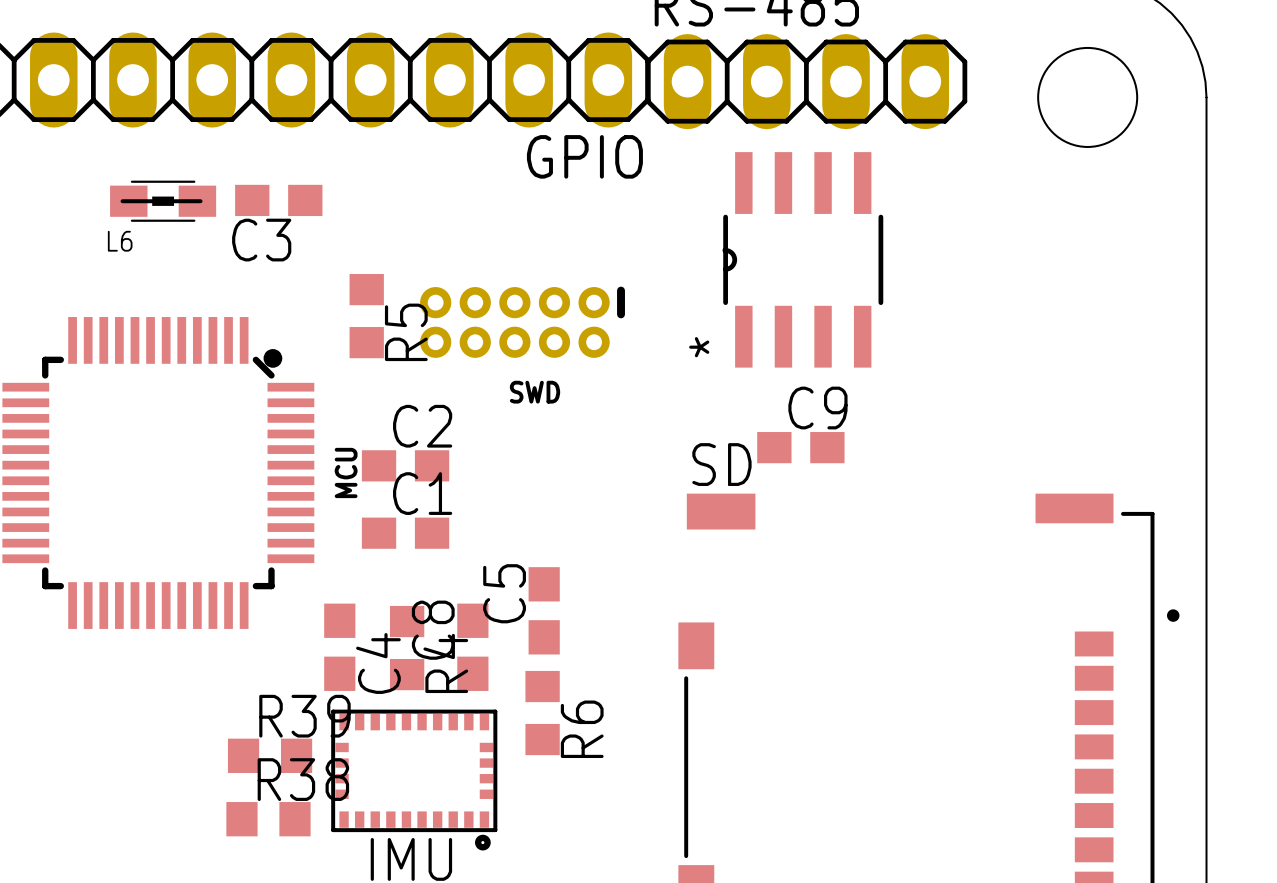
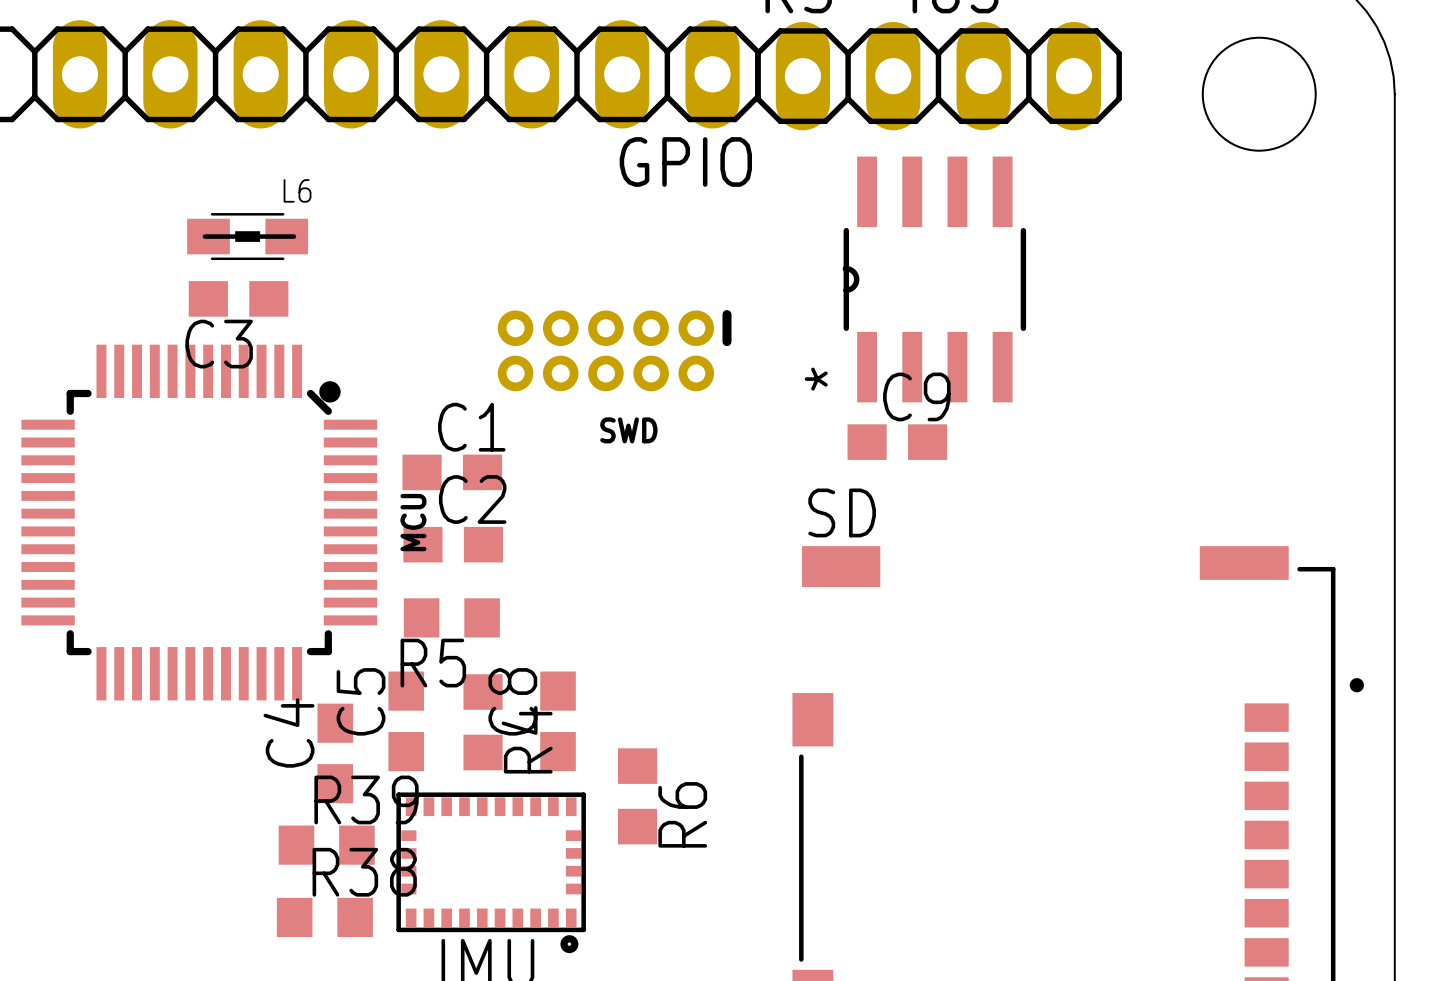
C3 position: (278, 200) -> (238, 298)
L6 rotation: 0° (163, 201) -> 180° (247, 236)
R5 rotation: 0° (366, 316) -> 90° clockwise (451, 617)
R5 position: (366, 316) -> (451, 617)
C9 position: (800, 447) -> (897, 442)
C2 position: (405, 465) -> (453, 544)
C1 position: (405, 533) -> (452, 472)
C5: (544, 610) -> none
C4 name: C4 (378, 663) -> C5 (361, 701)
C4: none -> (335, 753)

